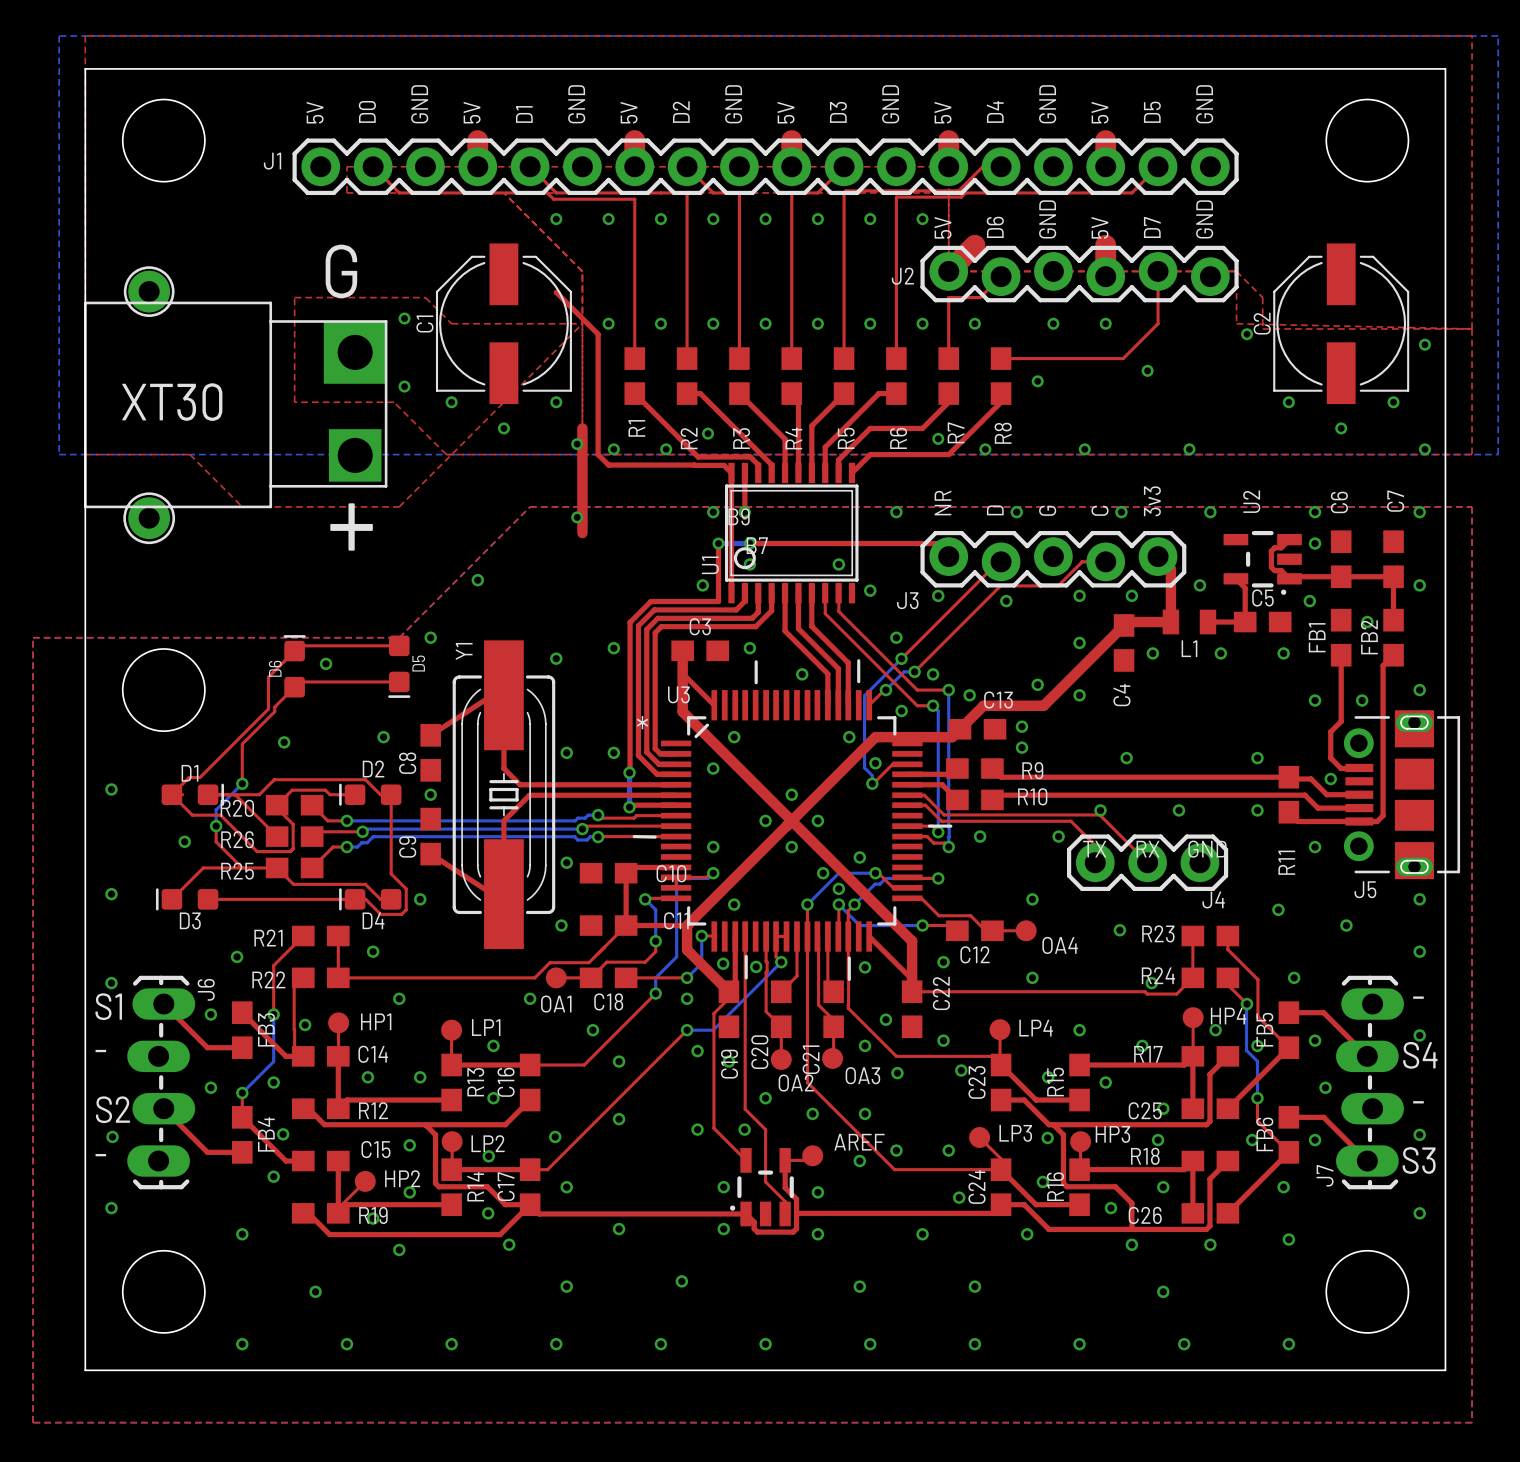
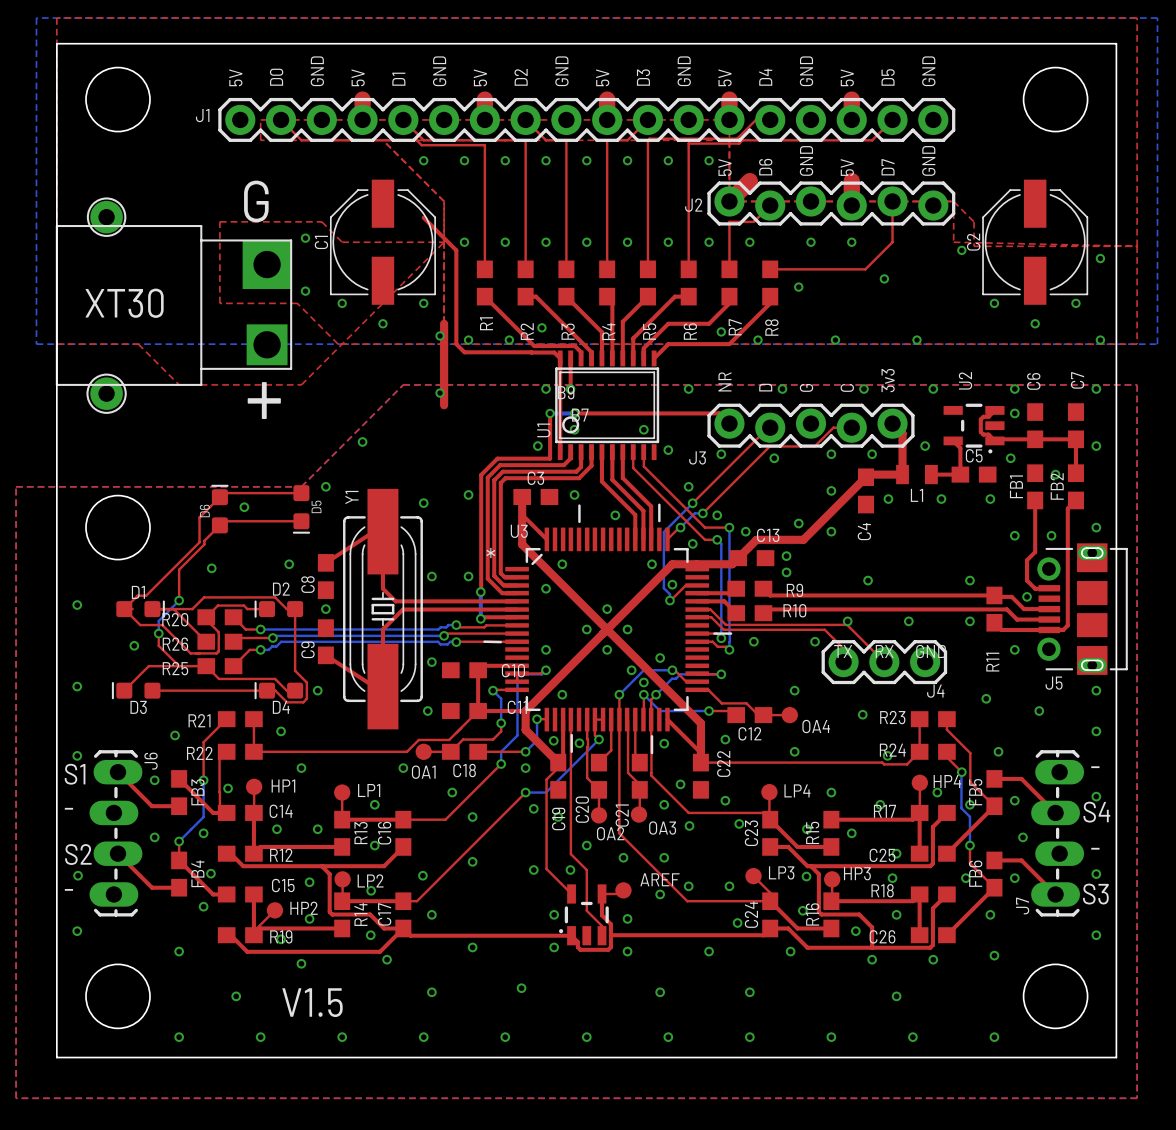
text: none -> V1.5 (312, 1002)

